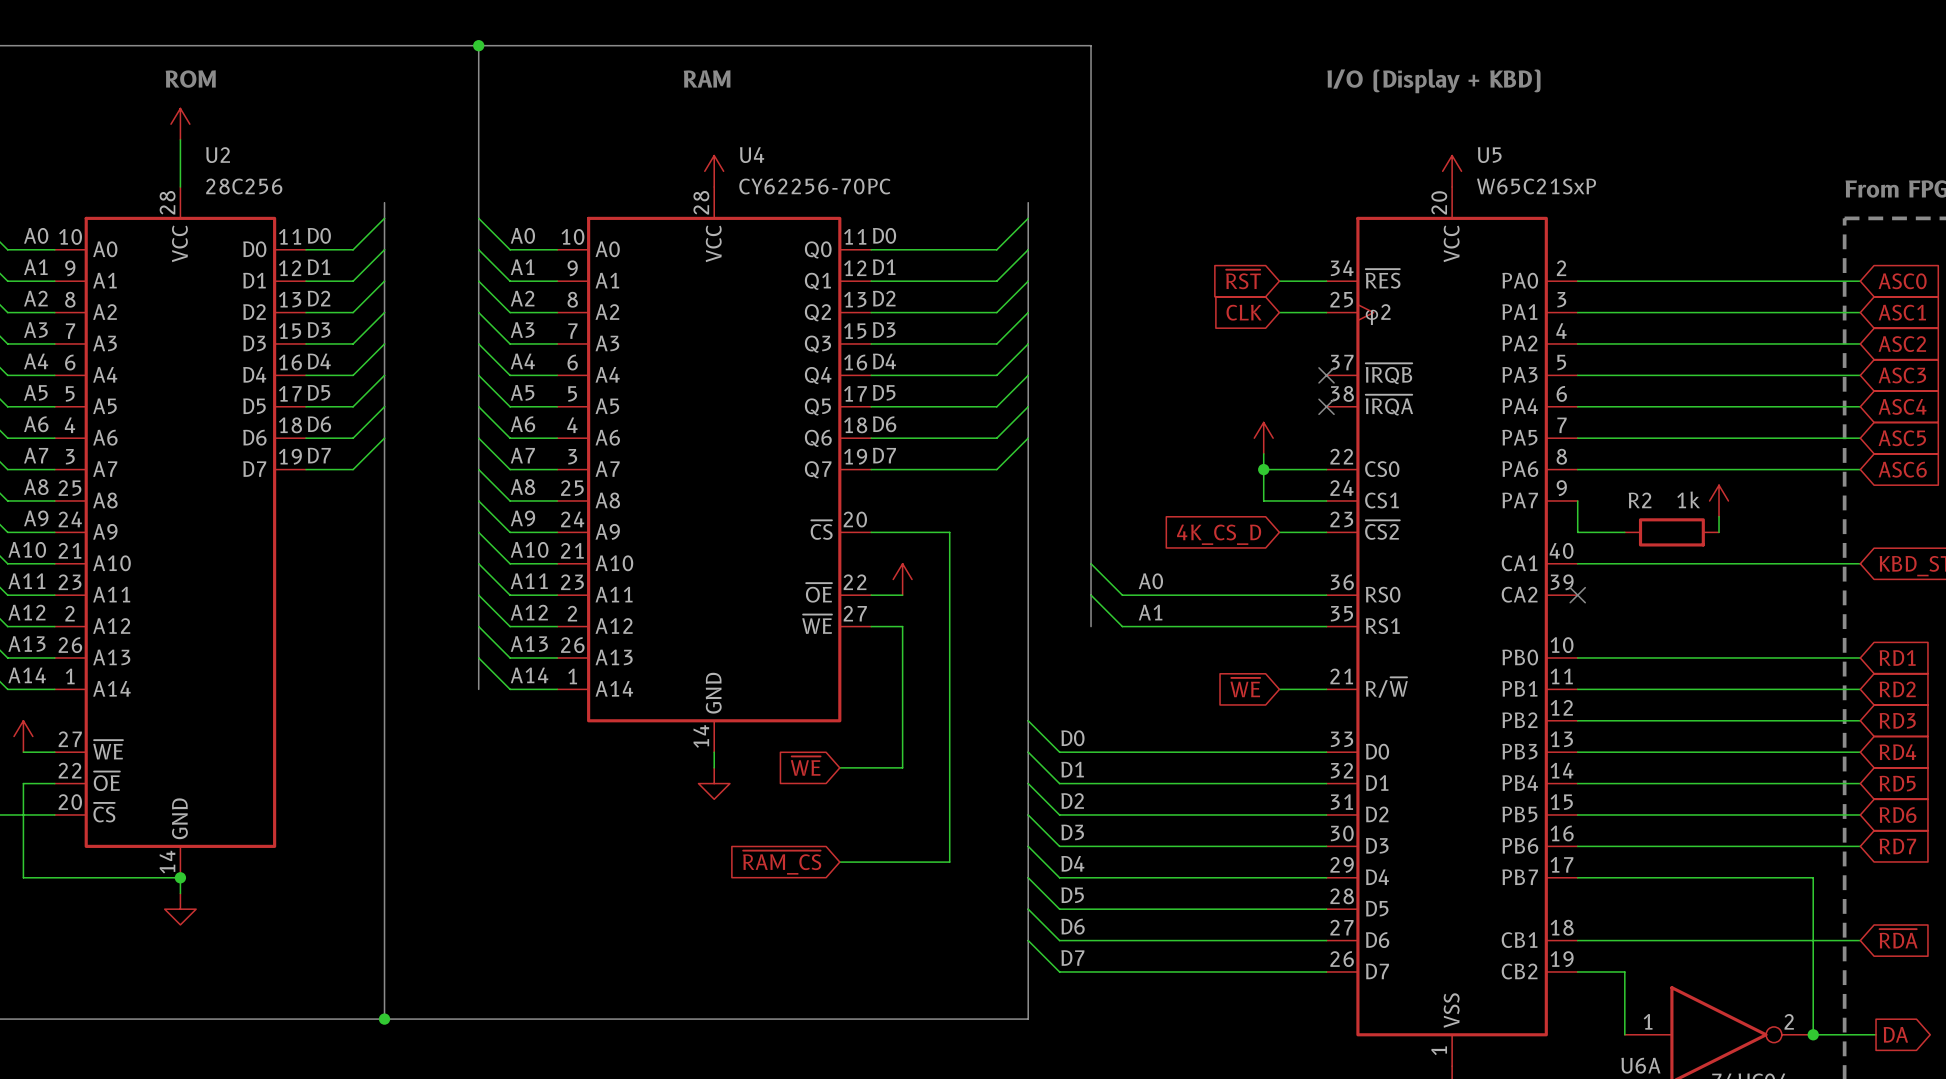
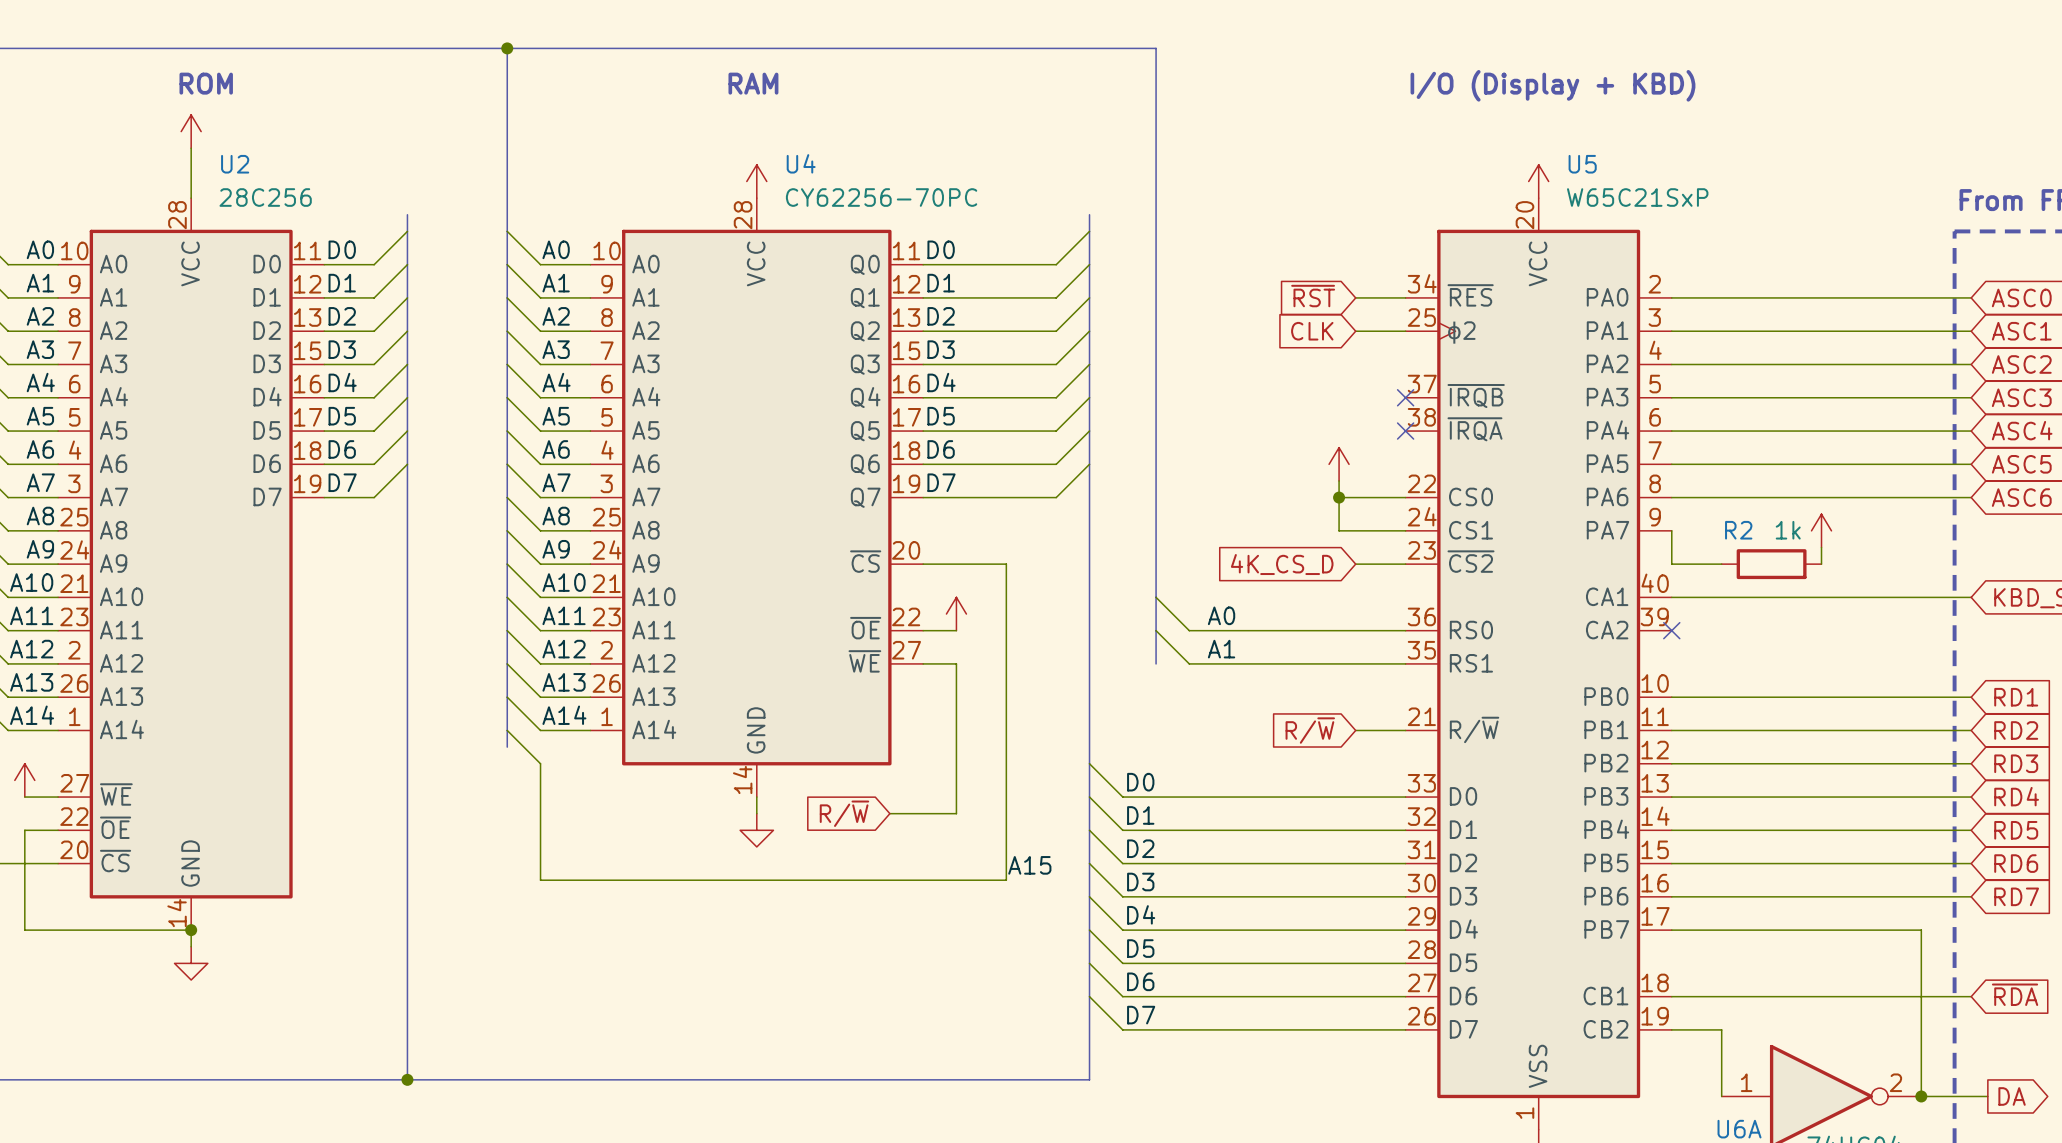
global label: ~{WE} (1245, 687) -> R/~{W} (1310, 730)
bus: none -> (507, 730) (507, 747)
global label: ~{WE} (805, 766) -> R/~{W} (844, 813)
label: none -> A15 (1029, 865)
wire: (949, 830) (949, 862) (839, 862) -> (1006, 880) (540, 880) (540, 763) (507, 730)
global label: ~{RAM_CS} (782, 862) -> none

